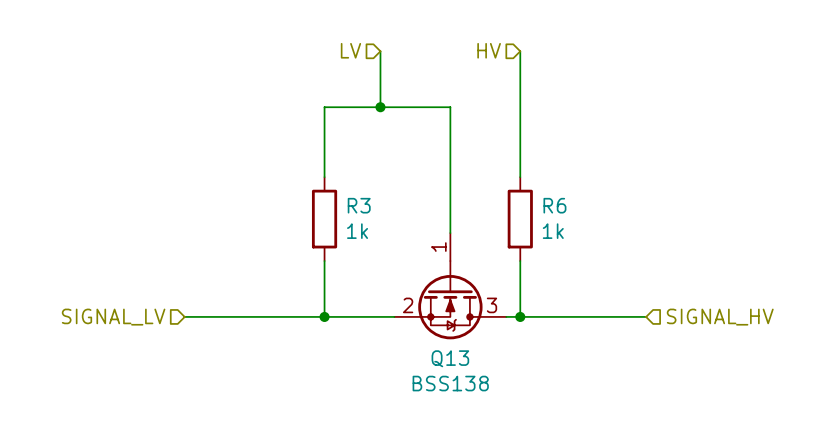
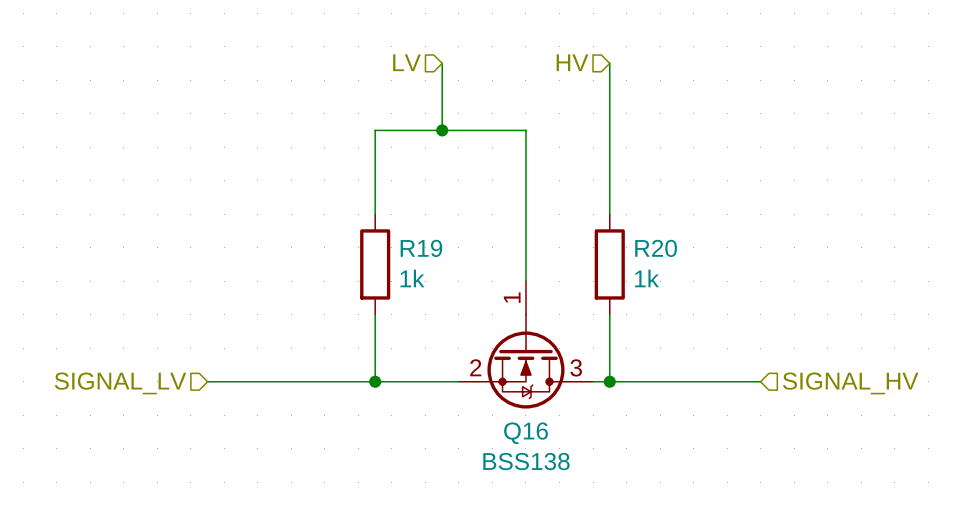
R3 name: R3 (359, 205) -> R19 (421, 248)
R6 name: R6 (554, 205) -> R20 (656, 248)
Q13 name: Q13 (450, 358) -> Q16 (526, 433)

